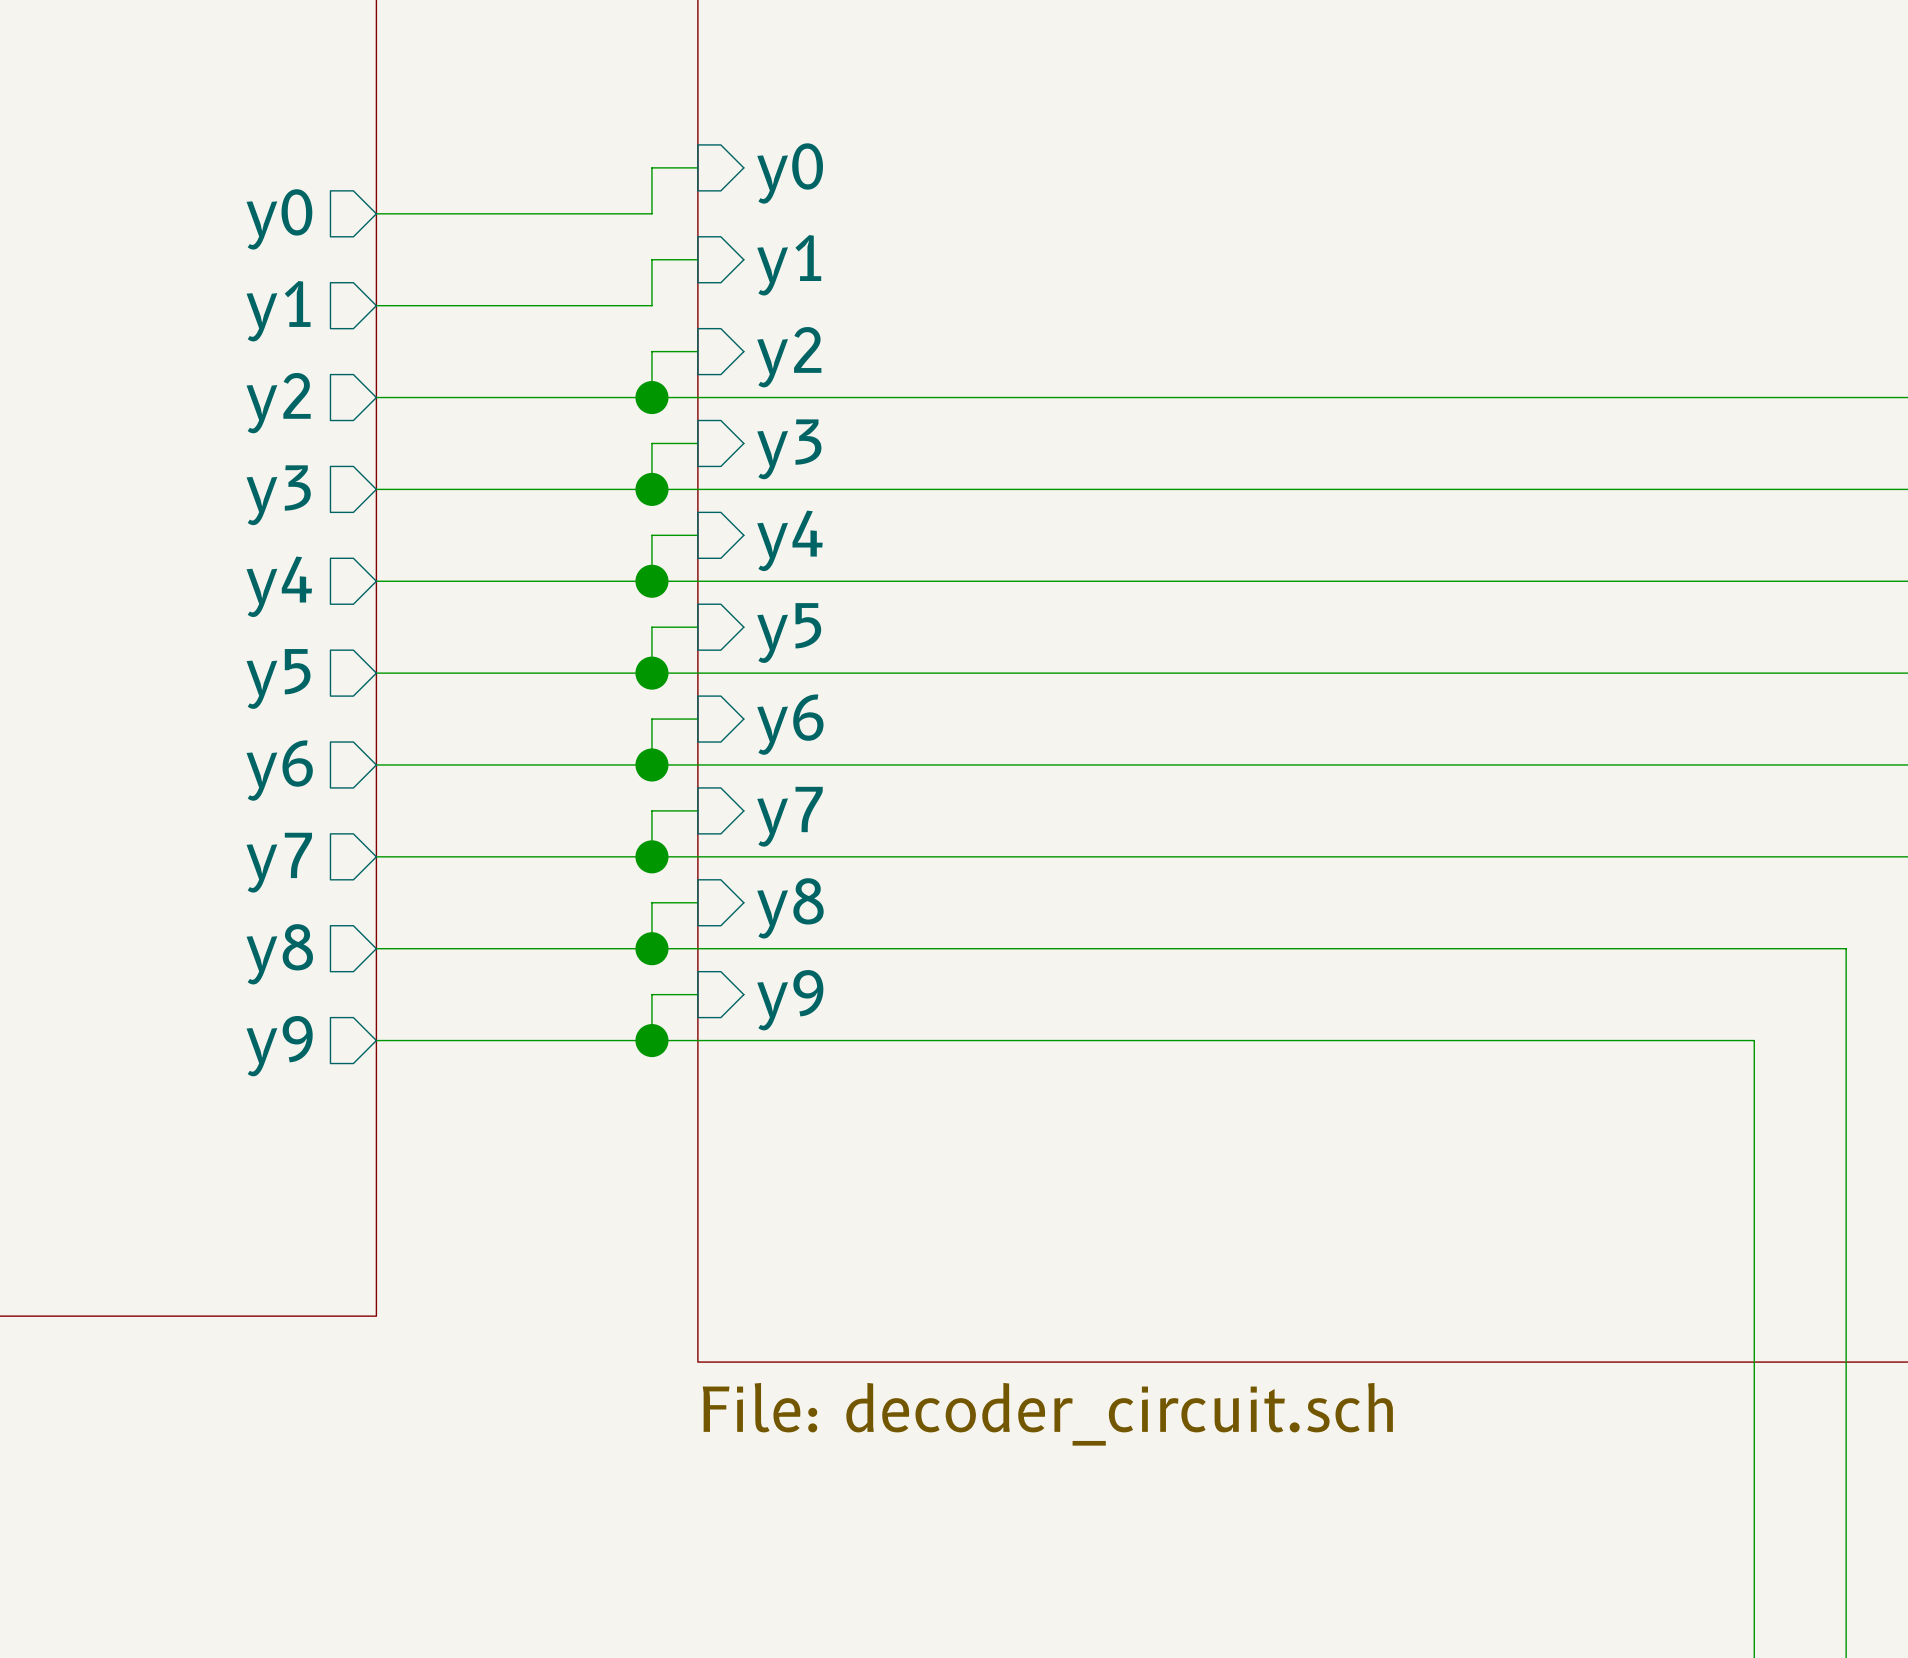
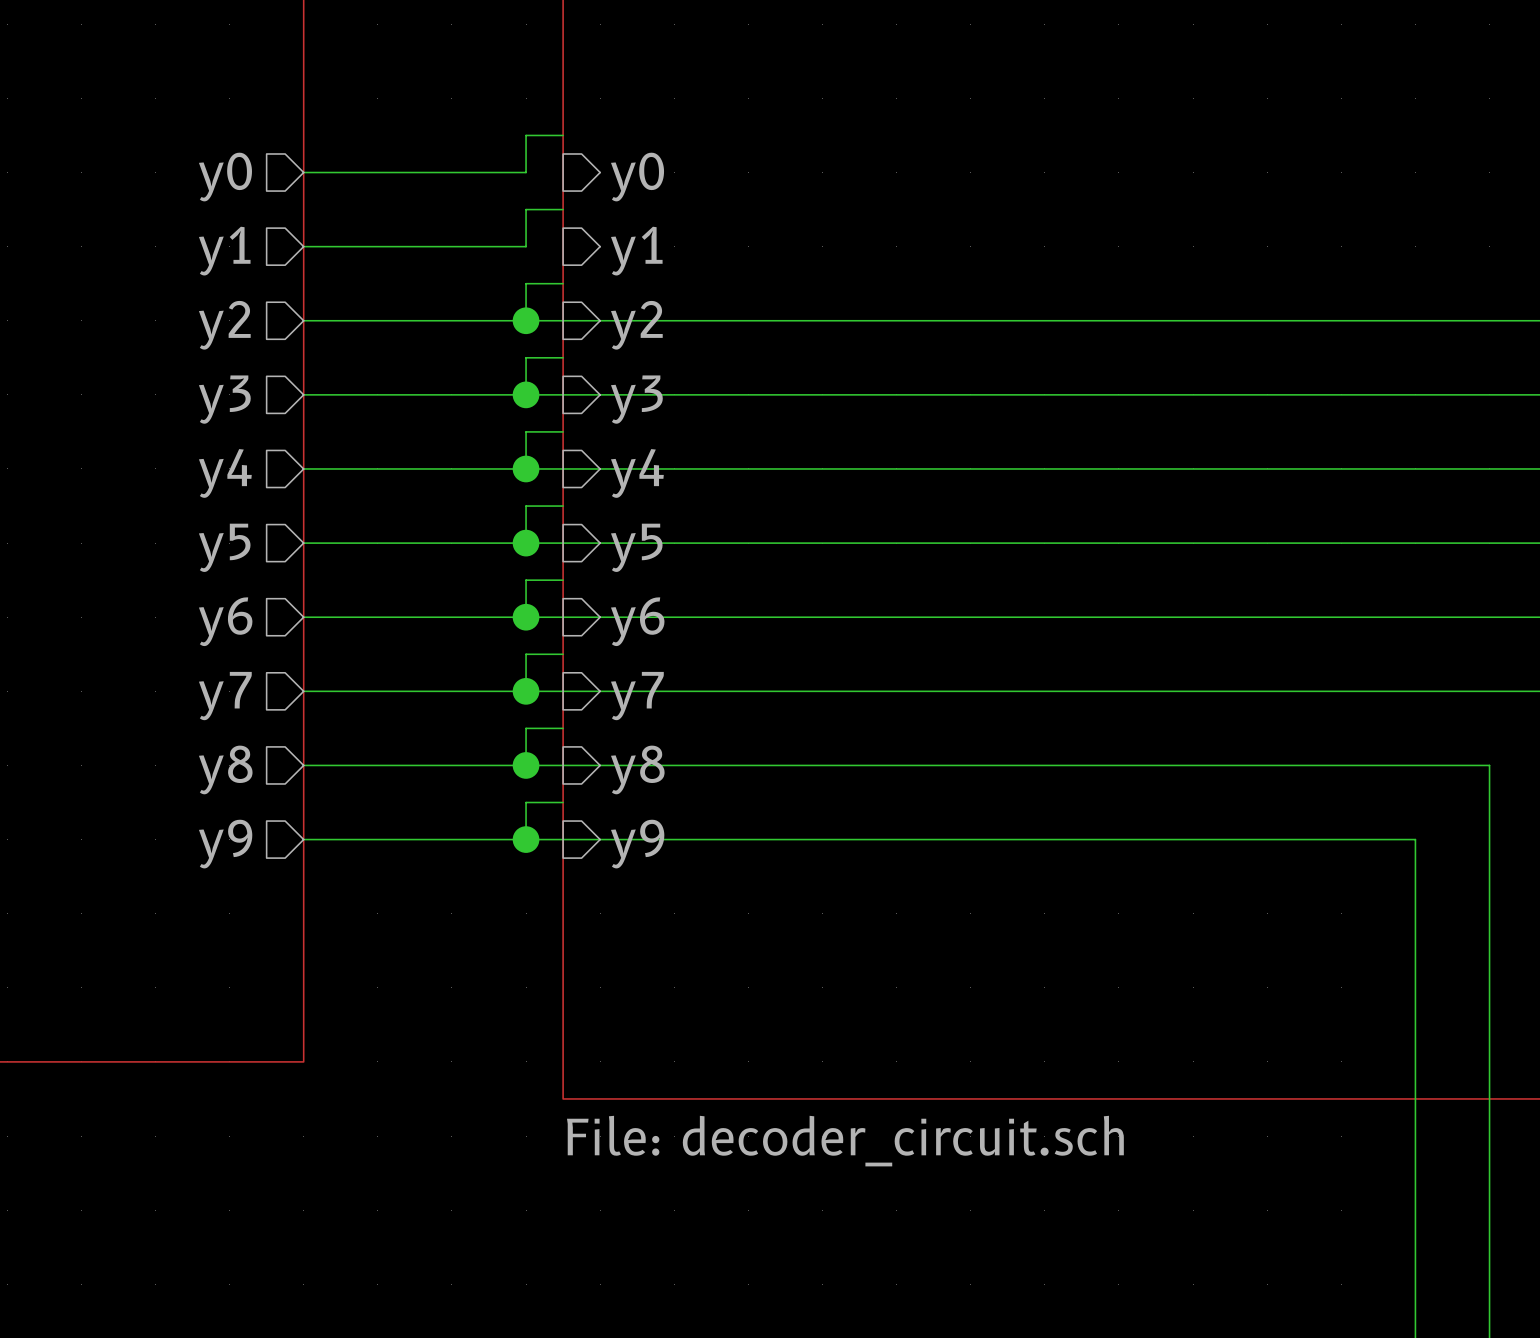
sheet pin position: y0 (790, 173) -> y0 (637, 177)
sheet pin position: y1 (789, 265) -> y1 (636, 251)
sheet pin position: y2 (789, 357) -> y2 (636, 325)
sheet pin position: y3 (789, 449) -> y3 (636, 399)
sheet pin position: y4 (789, 540) -> y4 (637, 473)
sheet pin position: y5 (789, 633) -> y5 (636, 547)
sheet pin position: y6 (790, 724) -> y6 (637, 621)
sheet pin position: y7 (789, 816) -> y7 (637, 696)
sheet pin position: y8 (790, 908) -> y8 (637, 769)
sheet pin position: y9 (790, 1000) -> y9 (637, 844)

